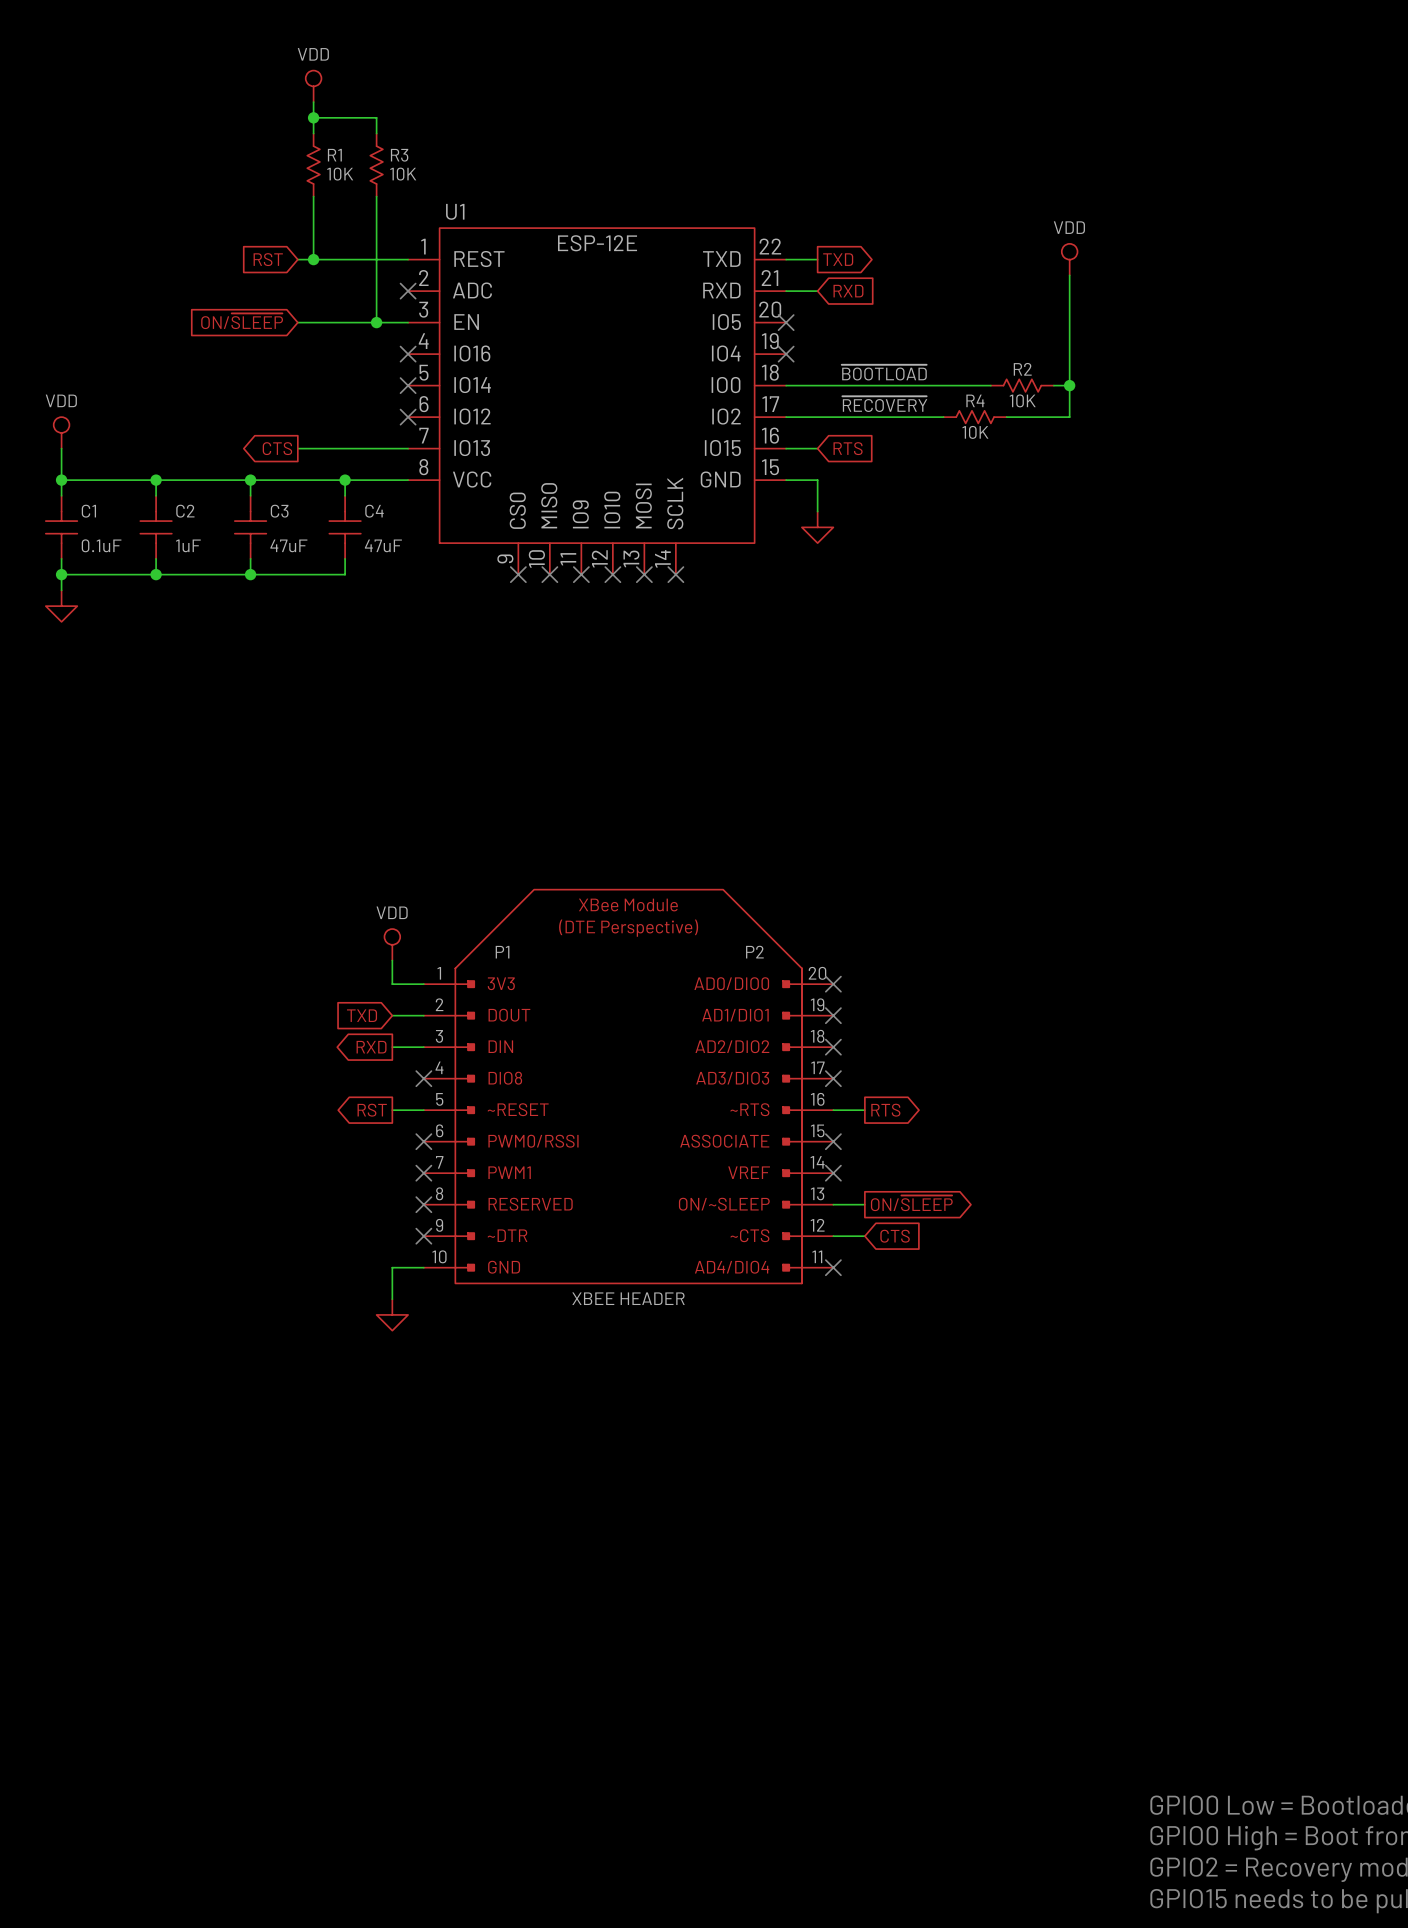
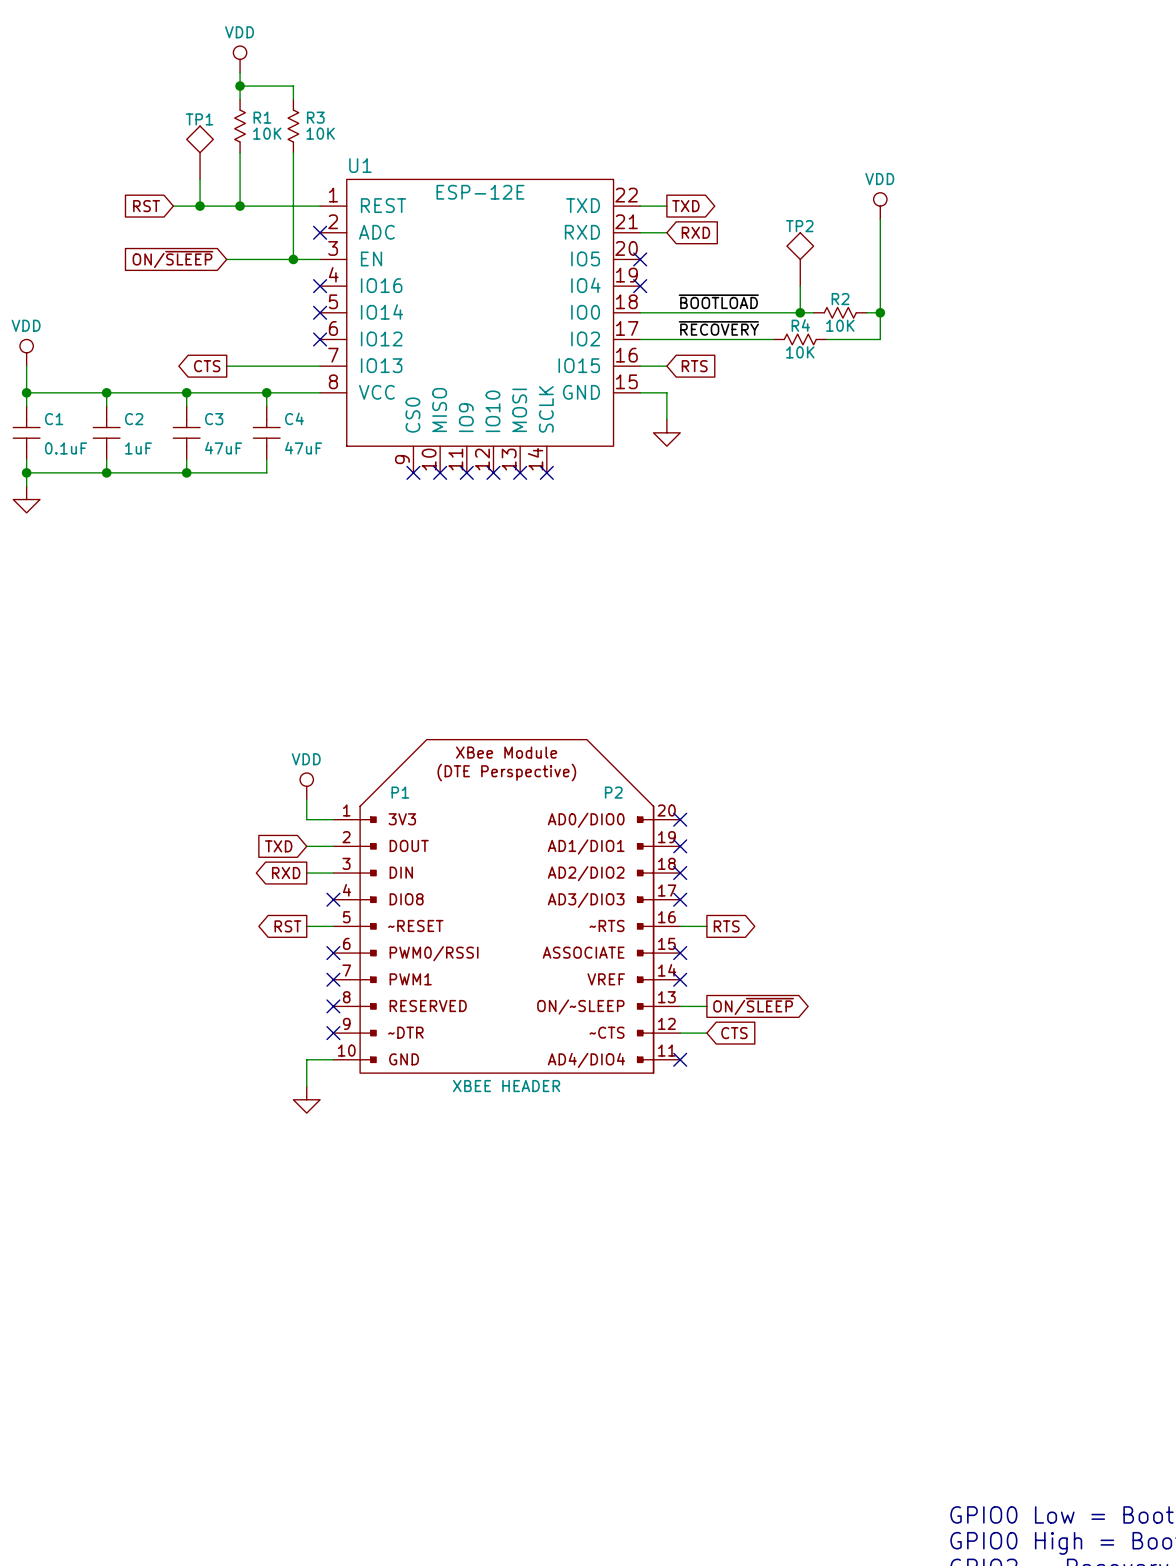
TP1: none -> (200, 152)
wire: none -> (200, 179) (200, 206)
wire: none -> (173, 206) (226, 206)
junction: none -> (200, 206)
global label position: RST (268, 259) -> RST (146, 206)
TP2: none -> (800, 259)
wire: none -> (800, 286) (800, 312)
junction: none -> (800, 312)

